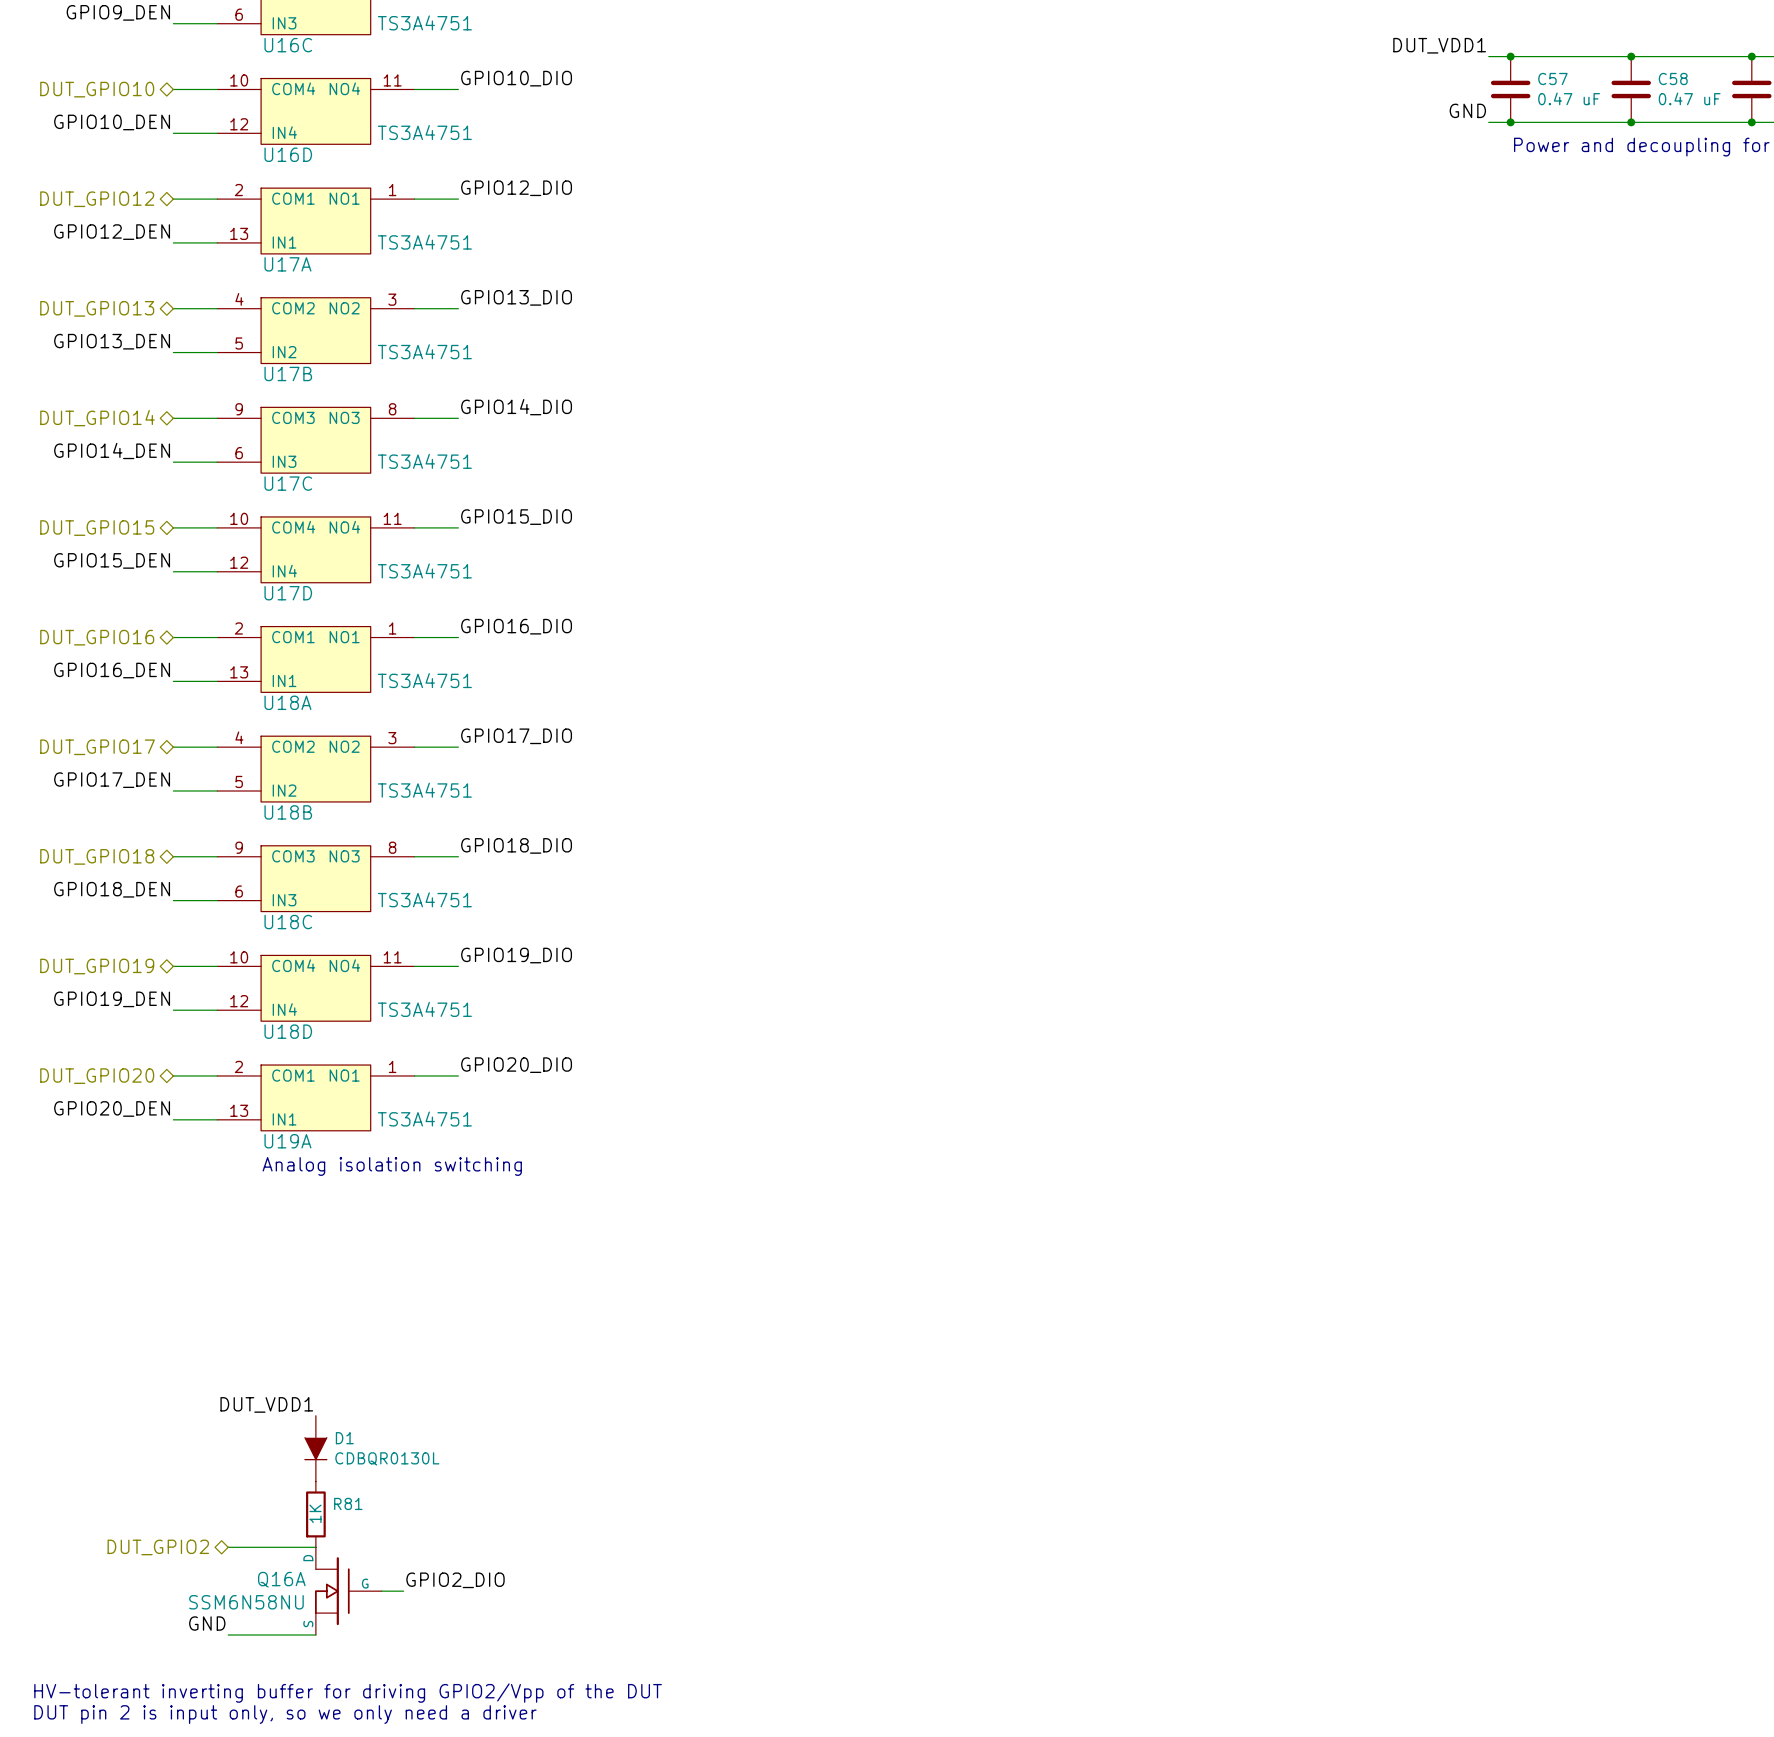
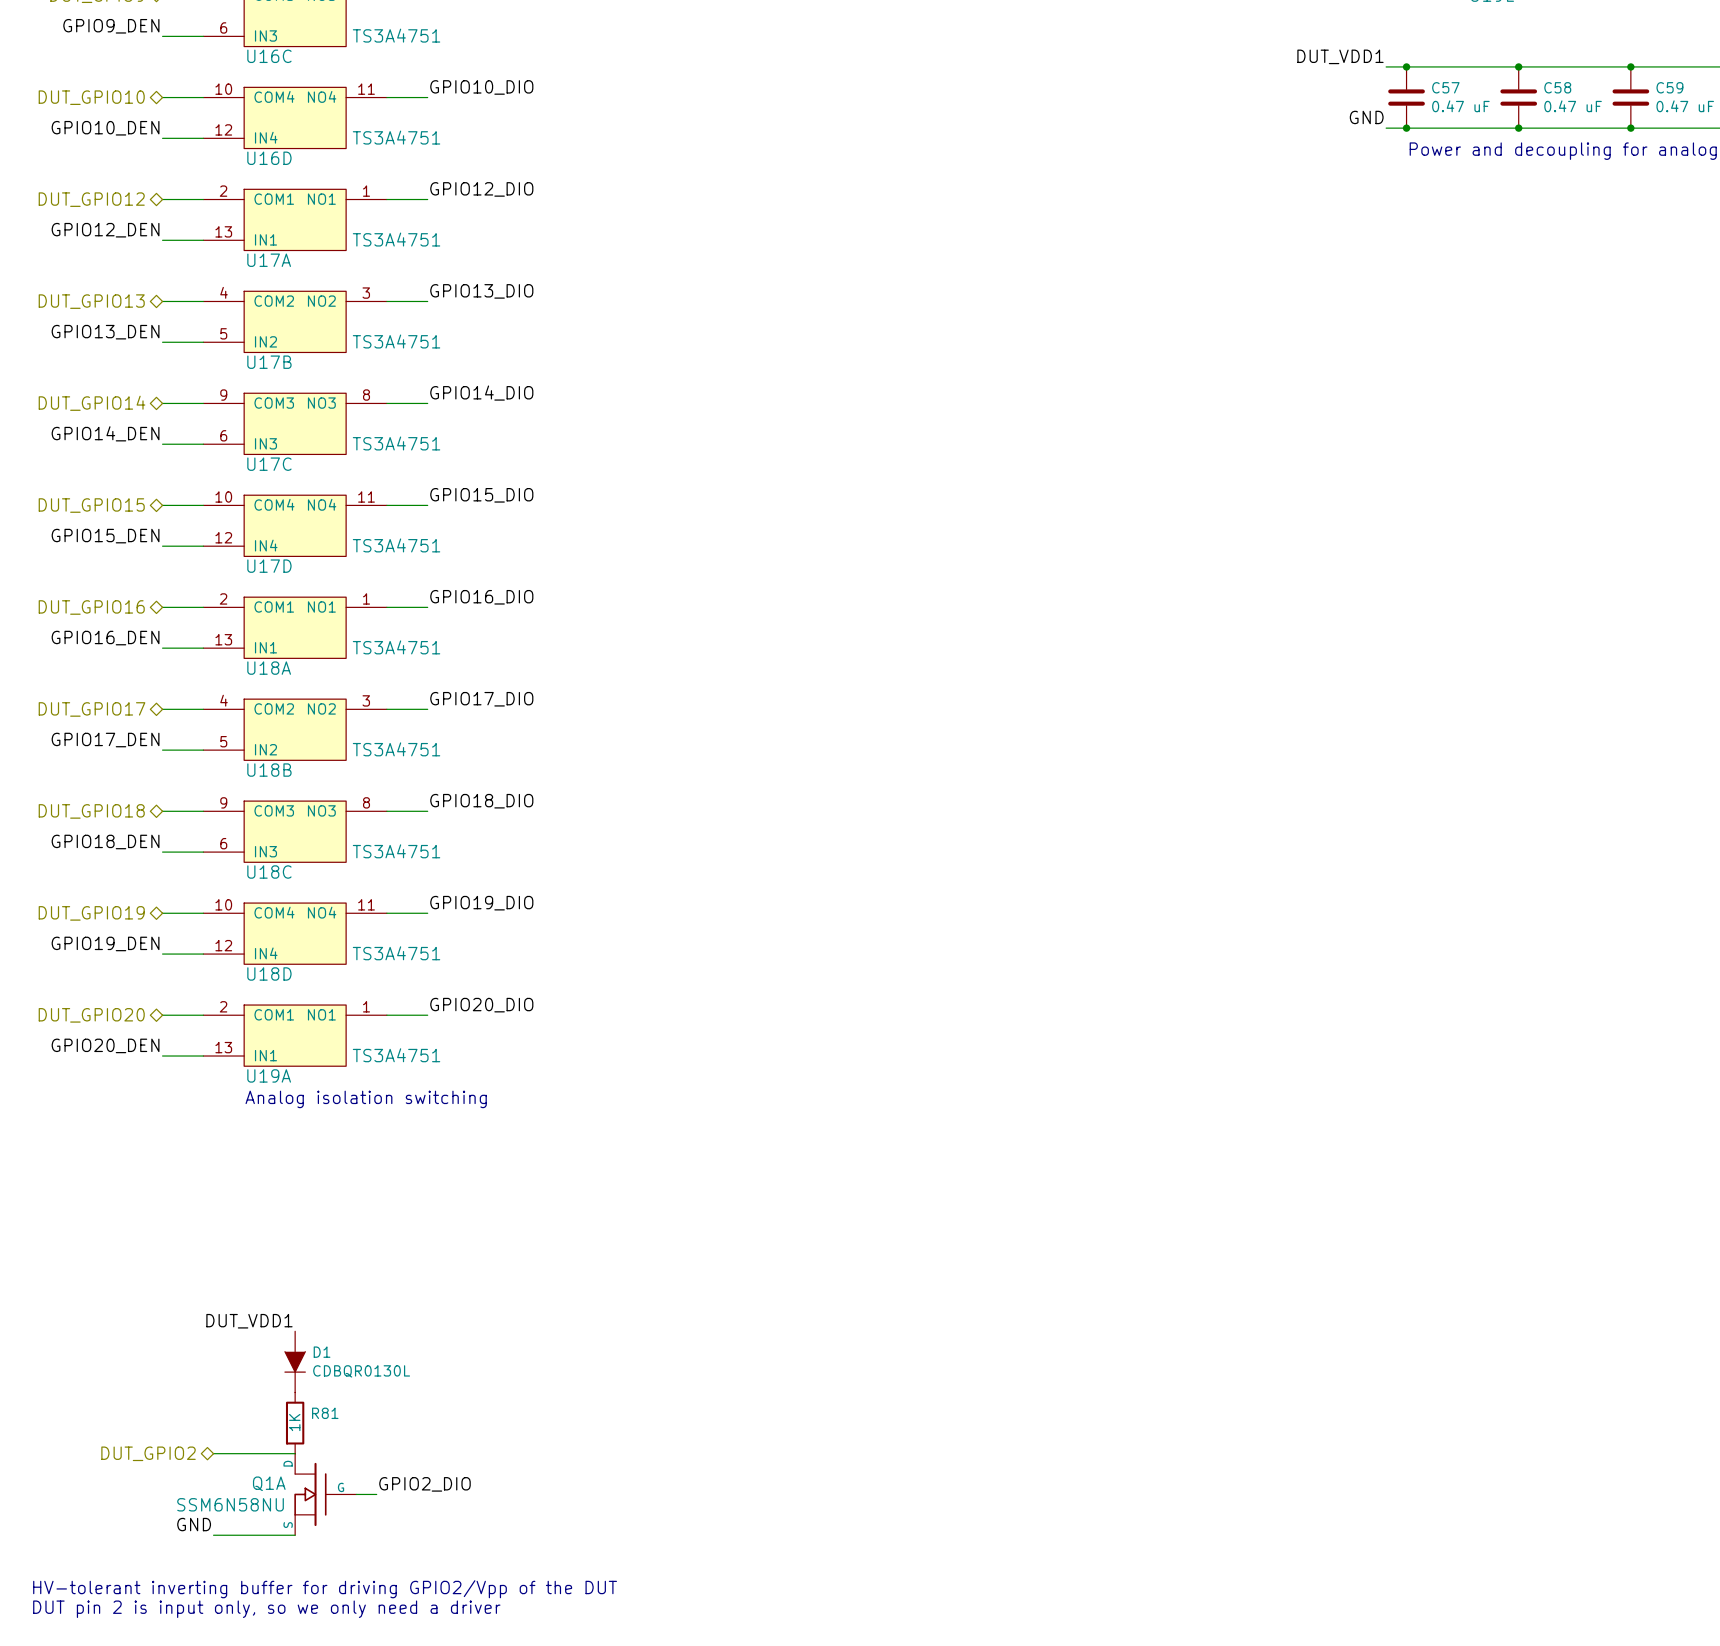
Q16A name: Q16A (281, 1579) -> Q1A (269, 1483)

